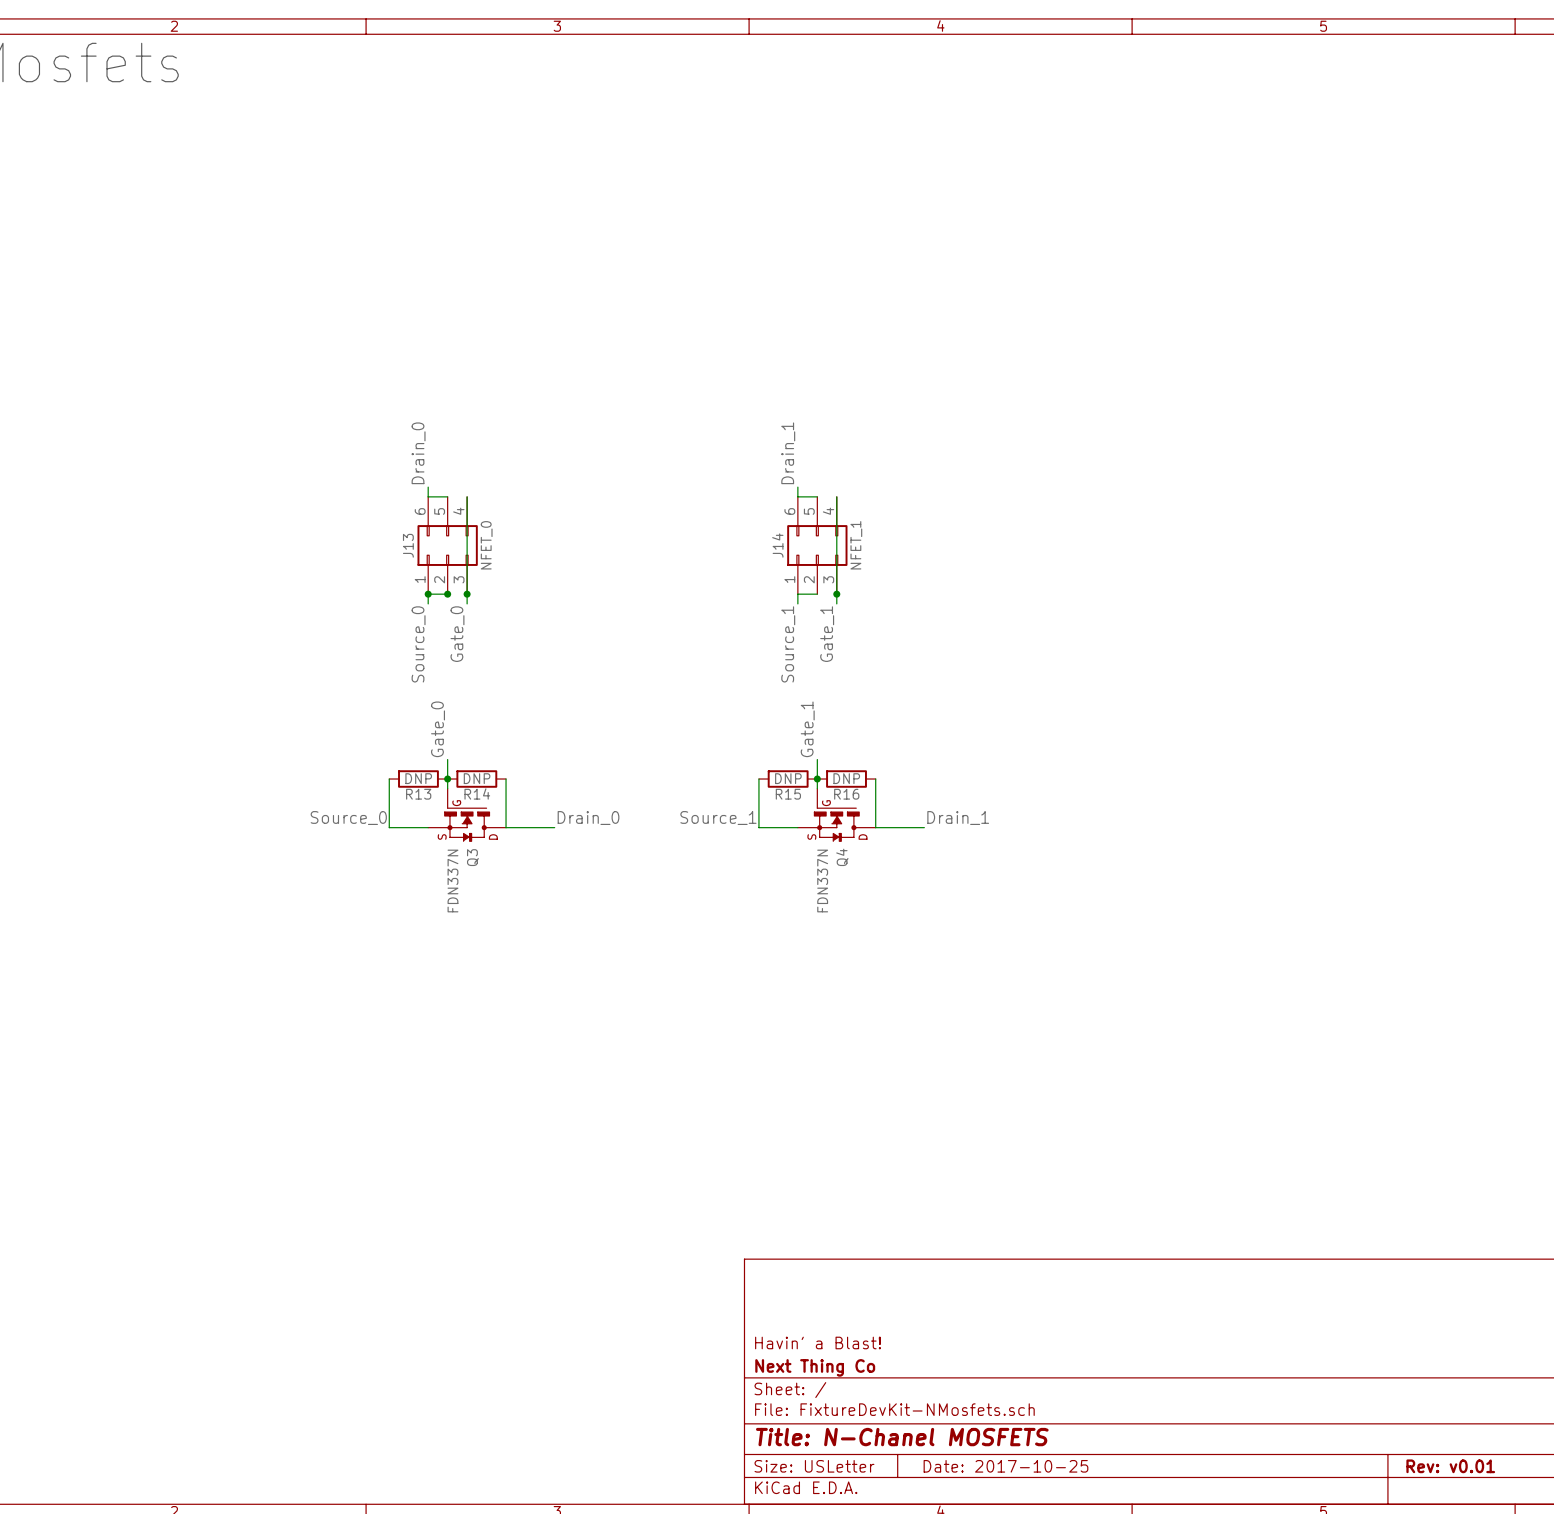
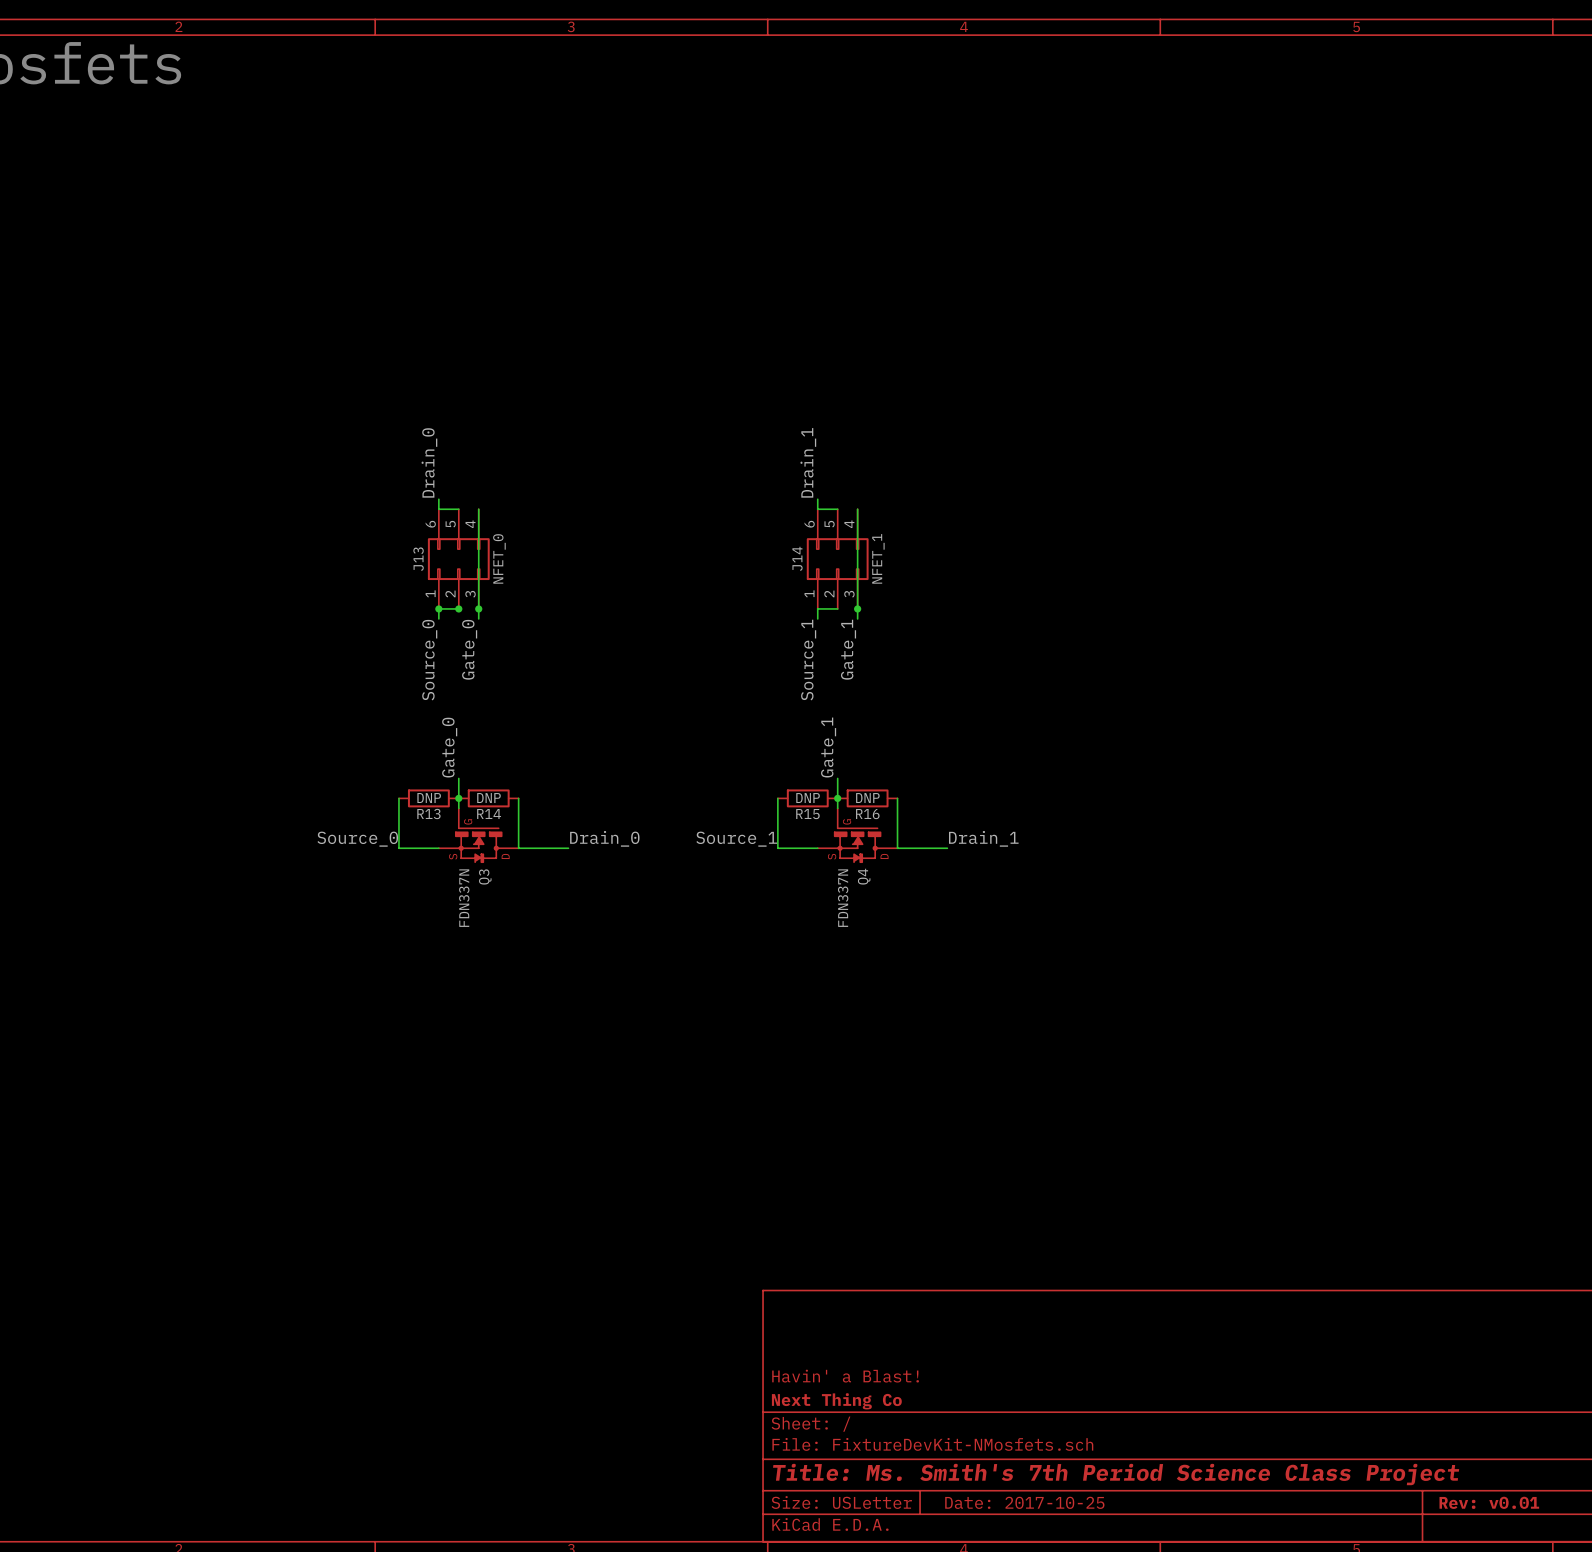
title block: Title: N-Chanel MOSFETS (902, 1437) -> Title: Ms. Smith's 7th Period Science Class Project (1116, 1474)

